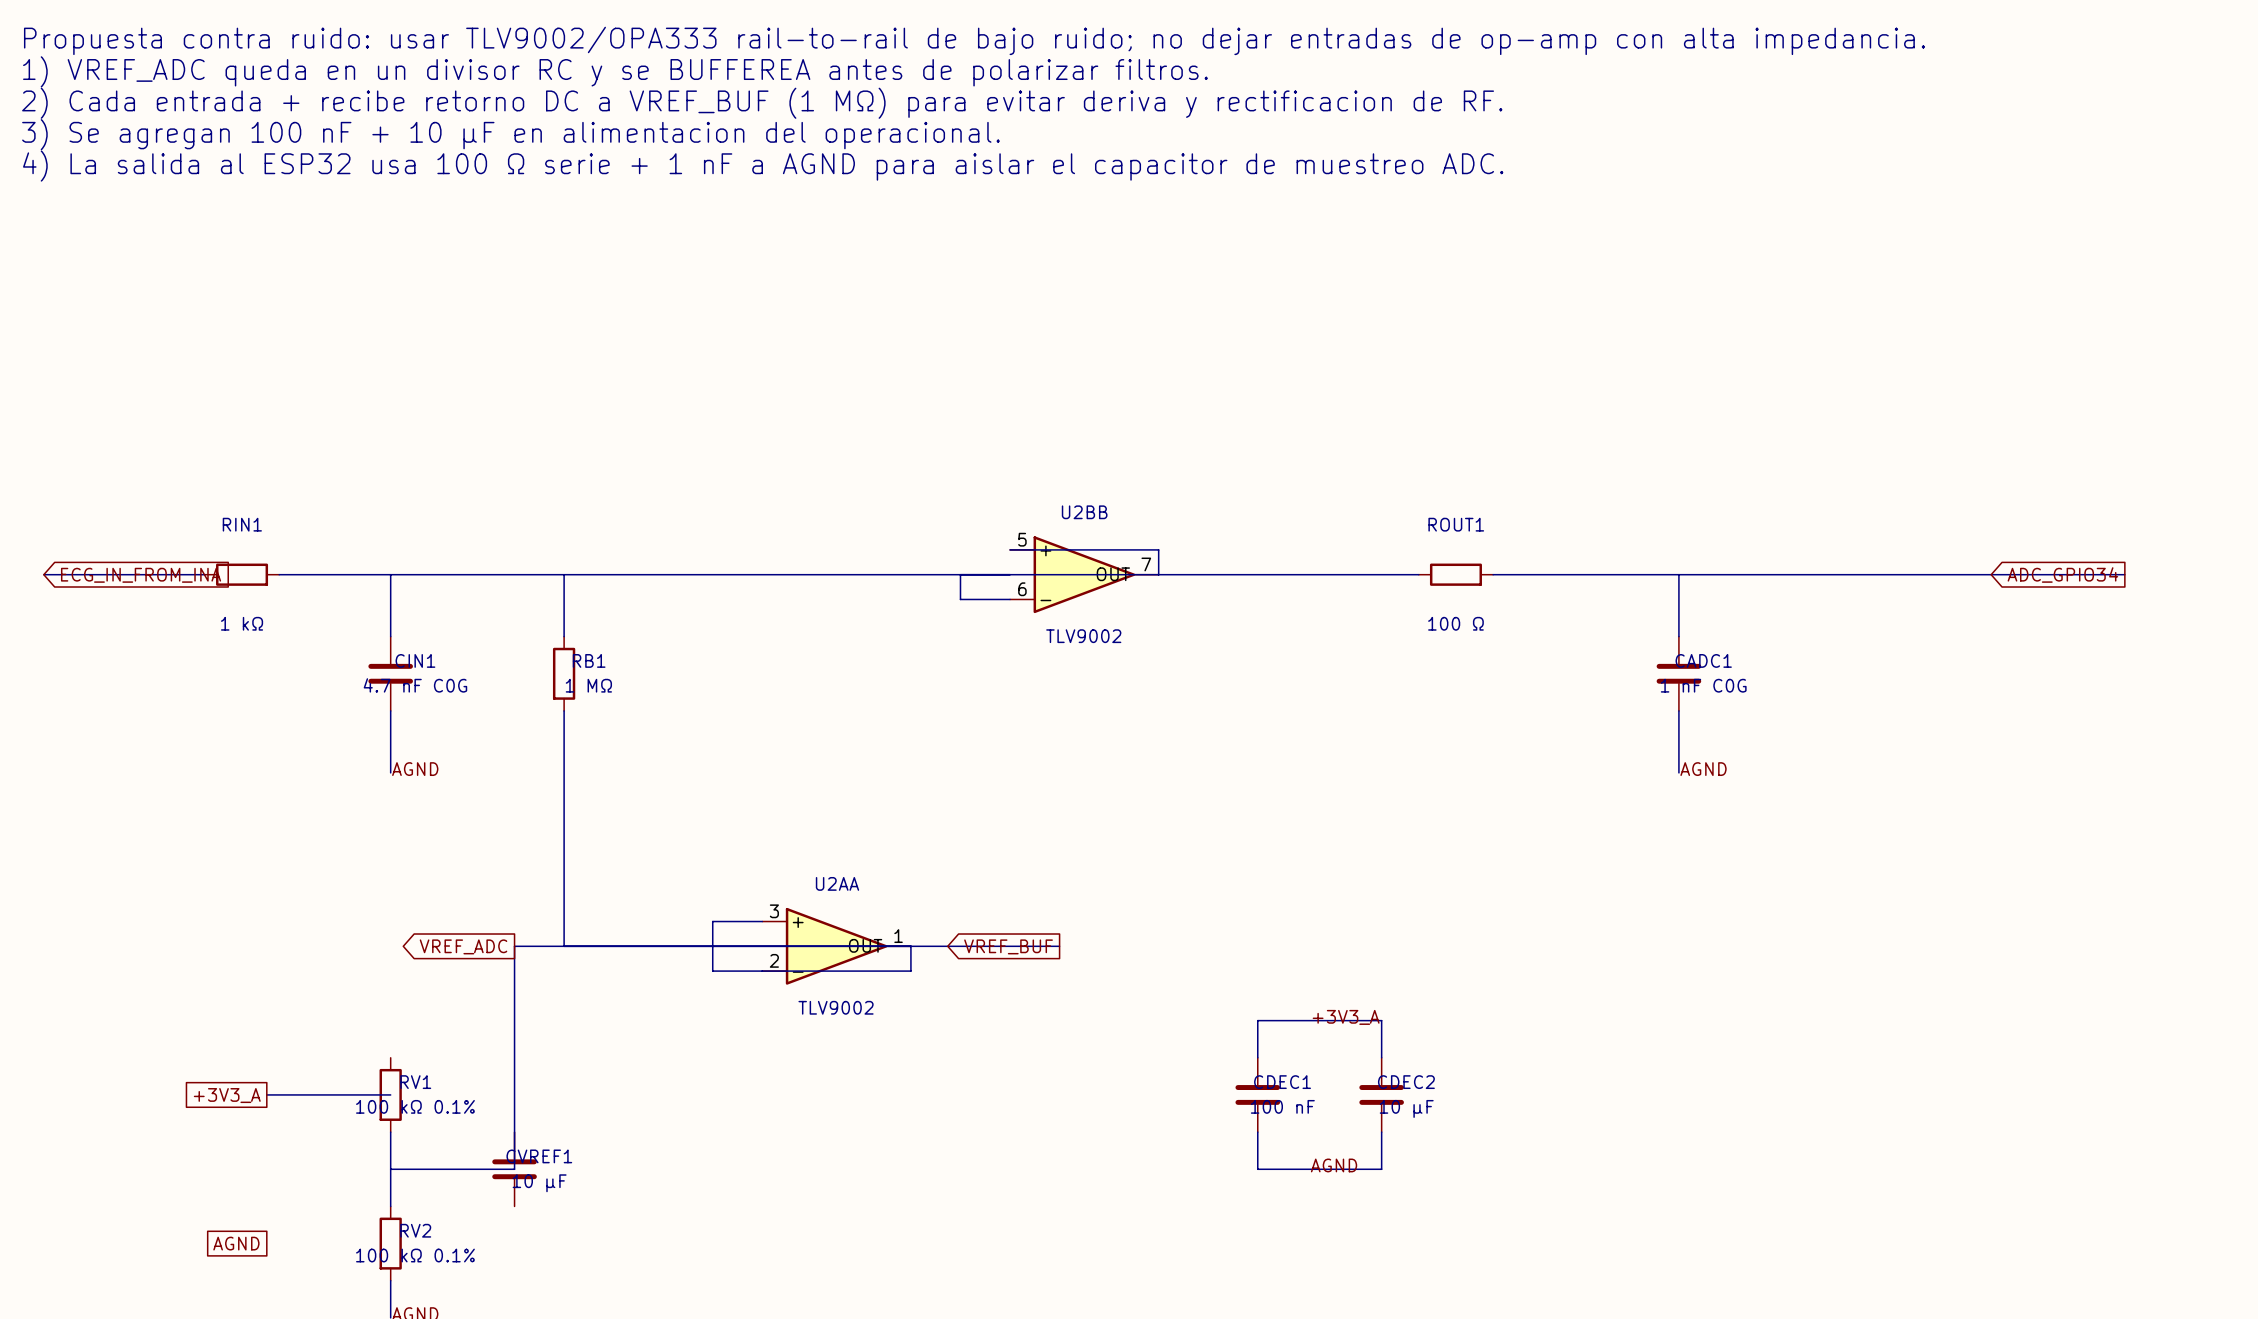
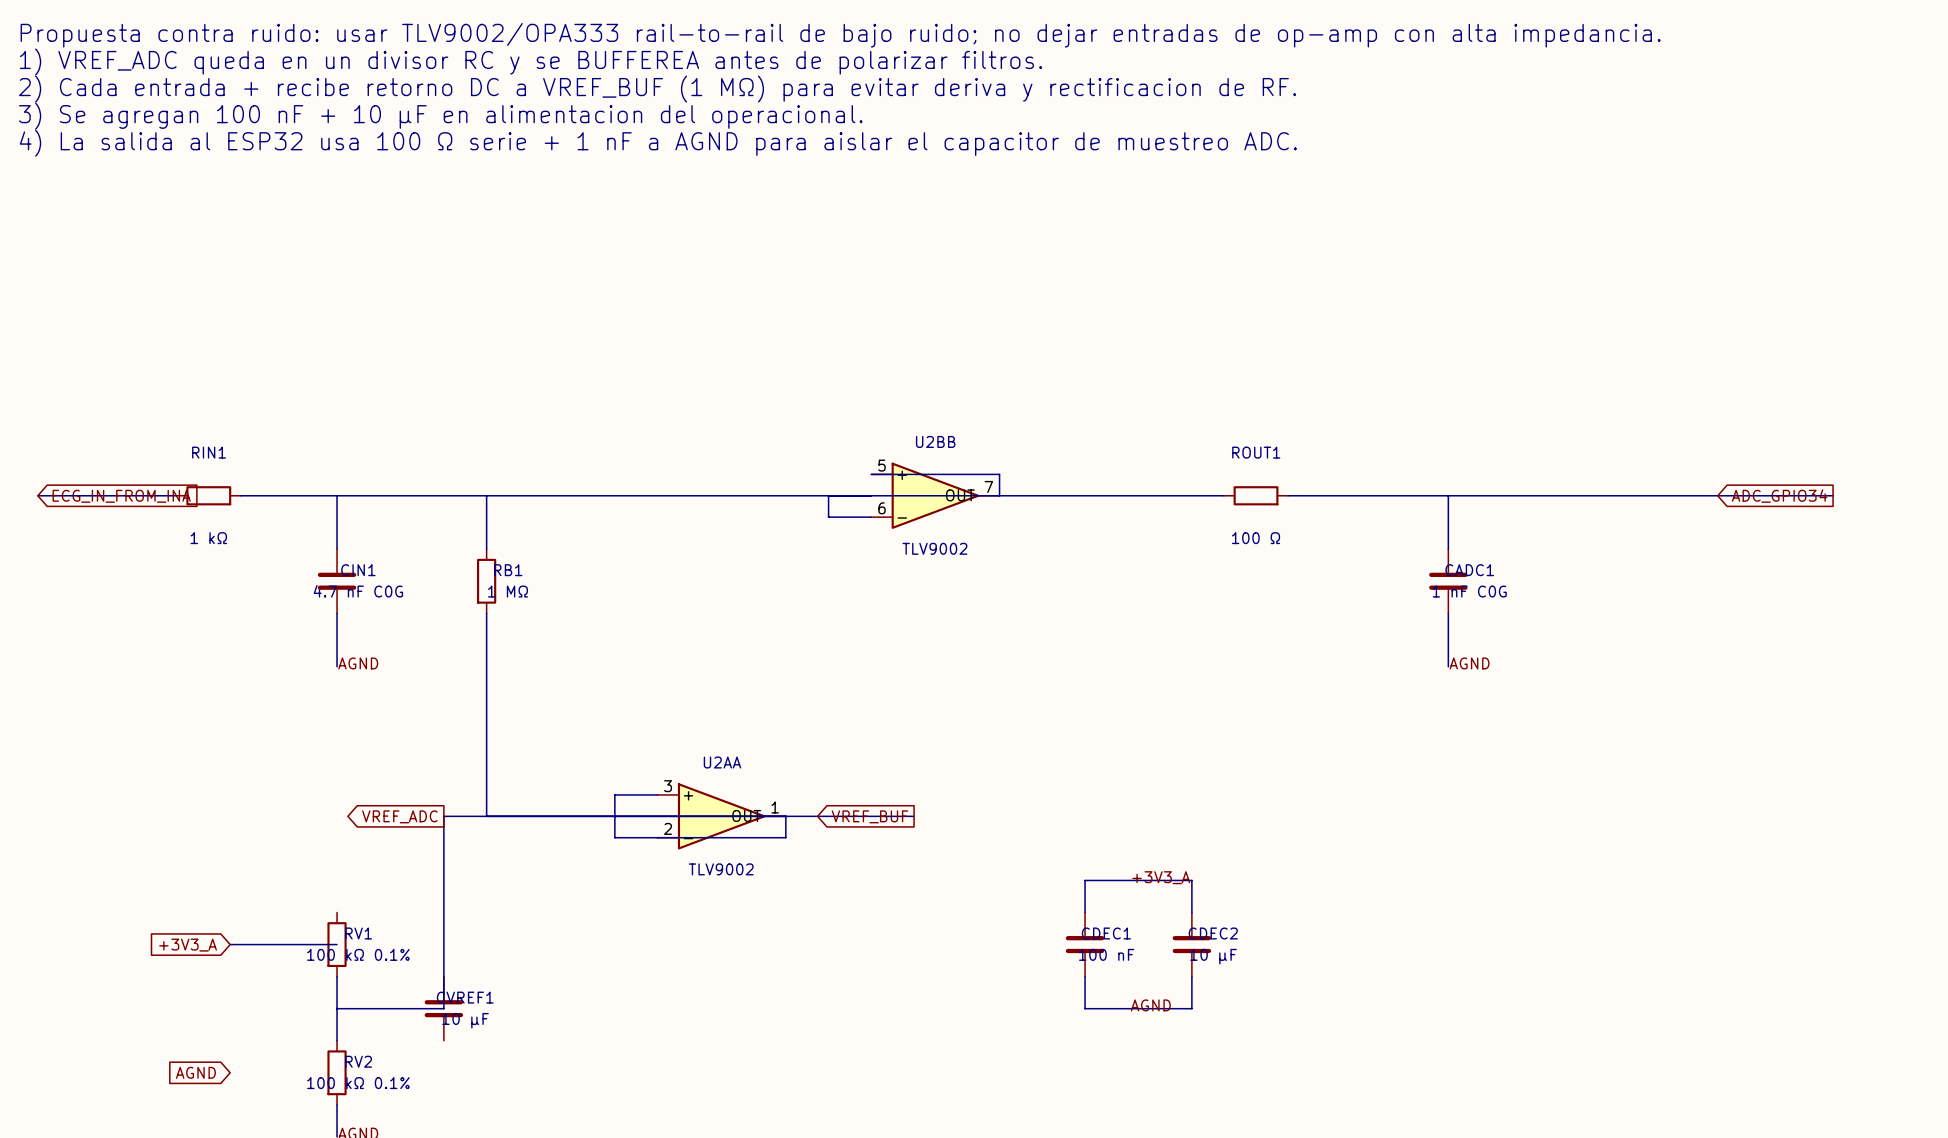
global label shape: passive (227, 1095) -> input (188, 945)
global label shape: passive (236, 1243) -> input (195, 1072)

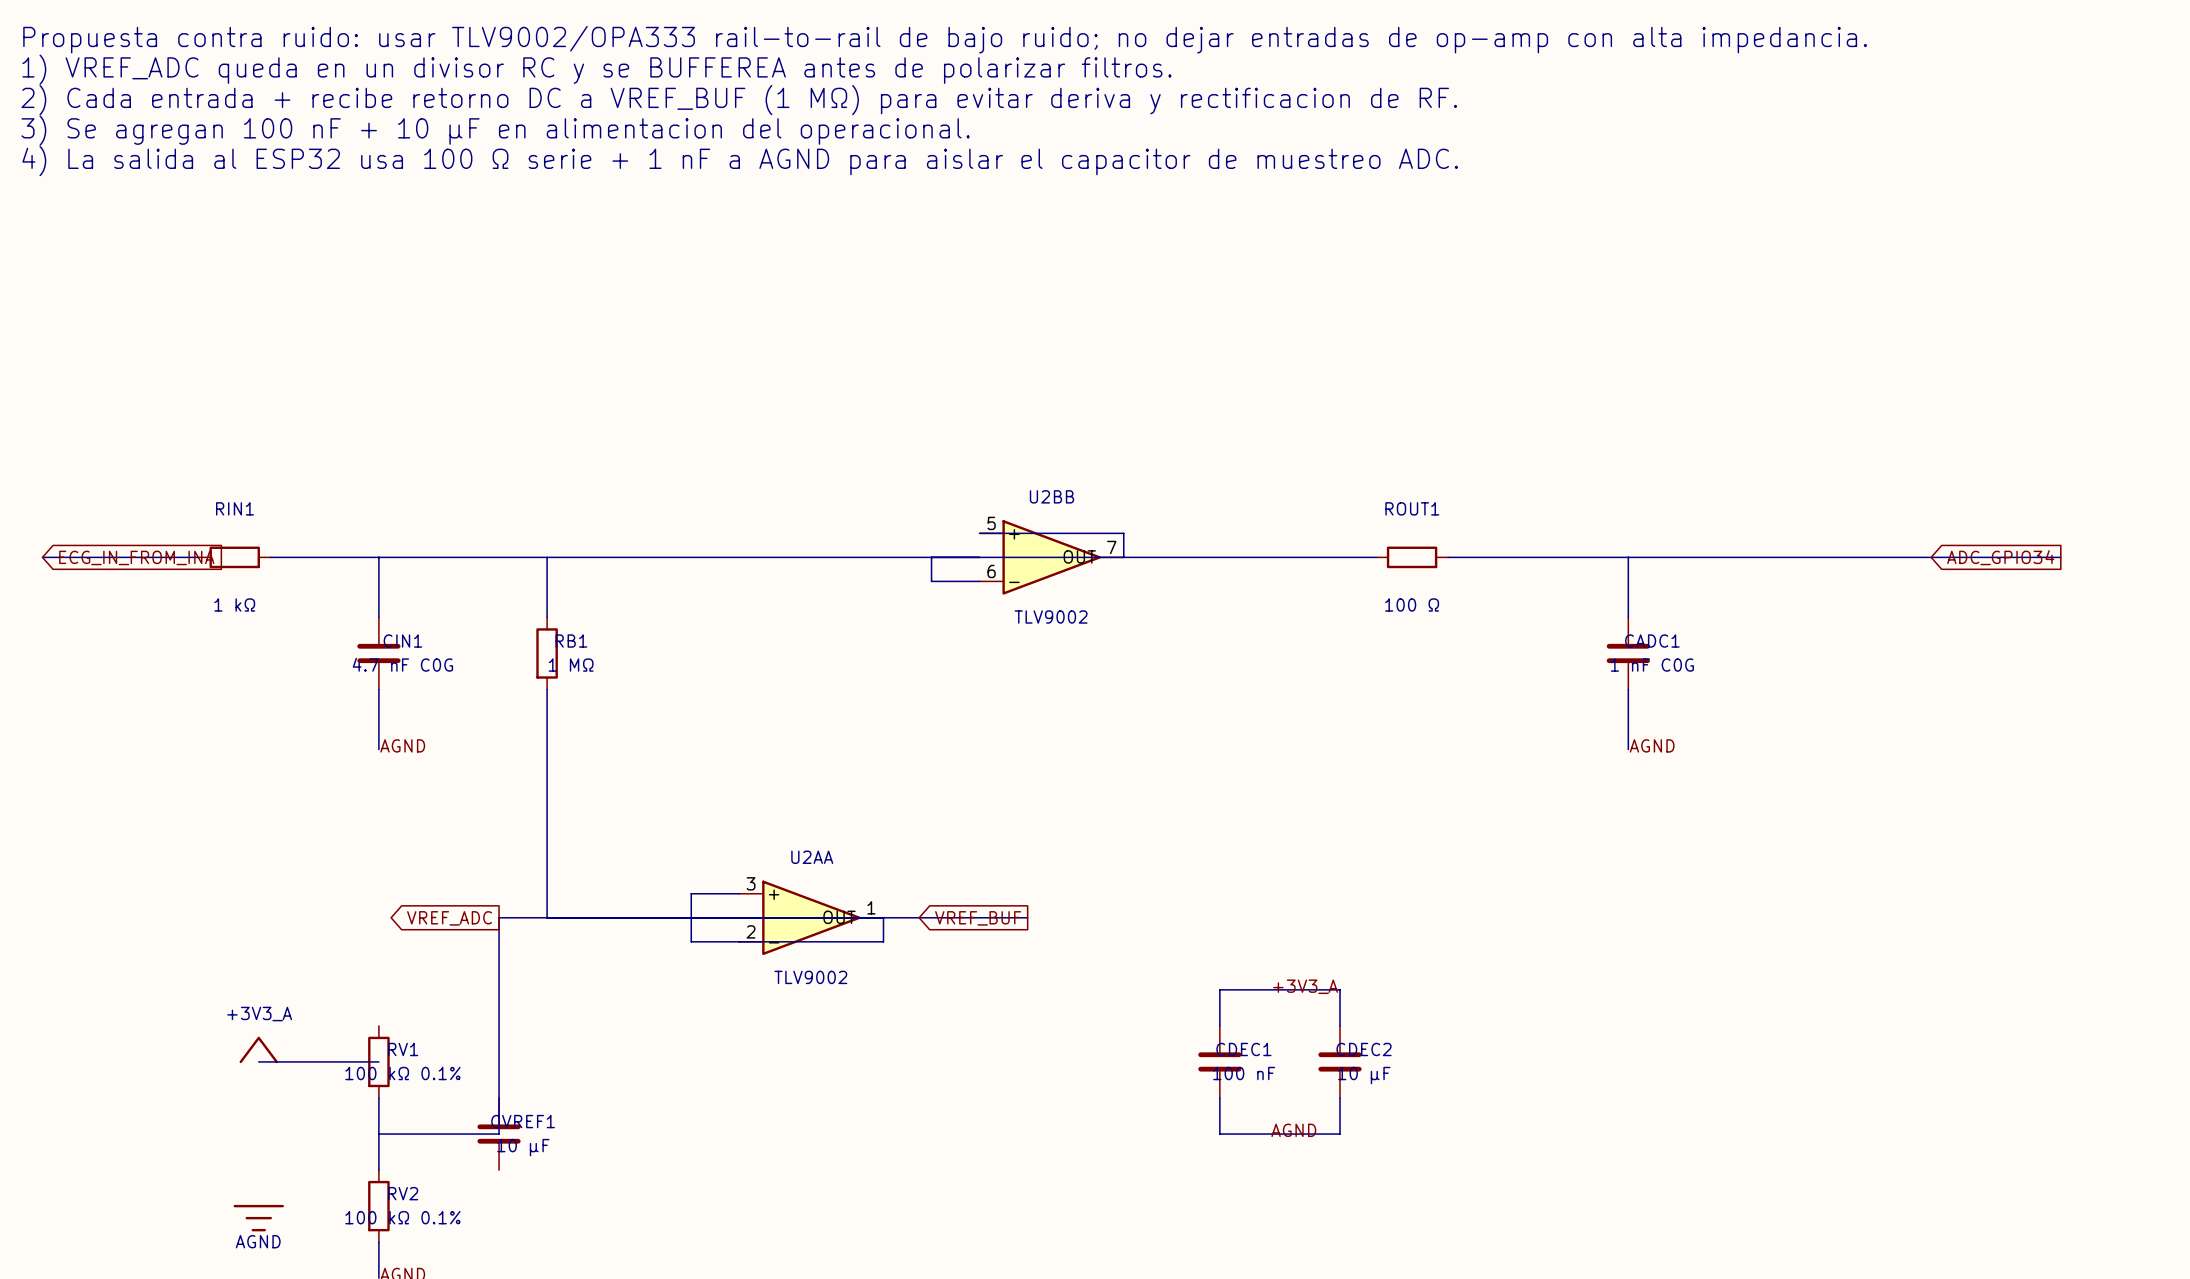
power symbol: none -> +3V3_A (258, 1049)
global label: +3V3_A (188, 945) -> none
global label: AGND (195, 1072) -> none
power symbol: none -> AGND (258, 1218)

